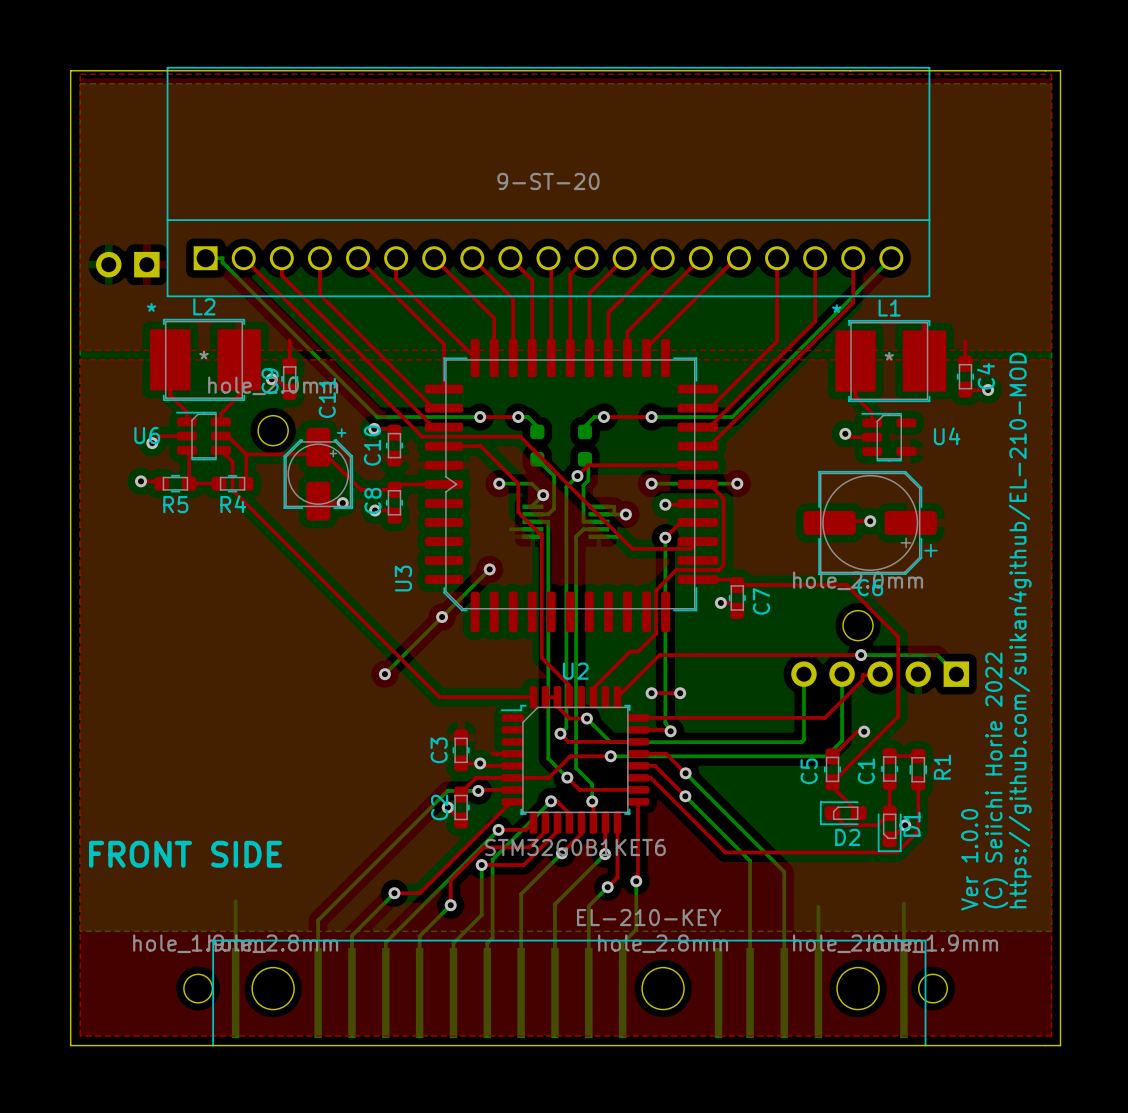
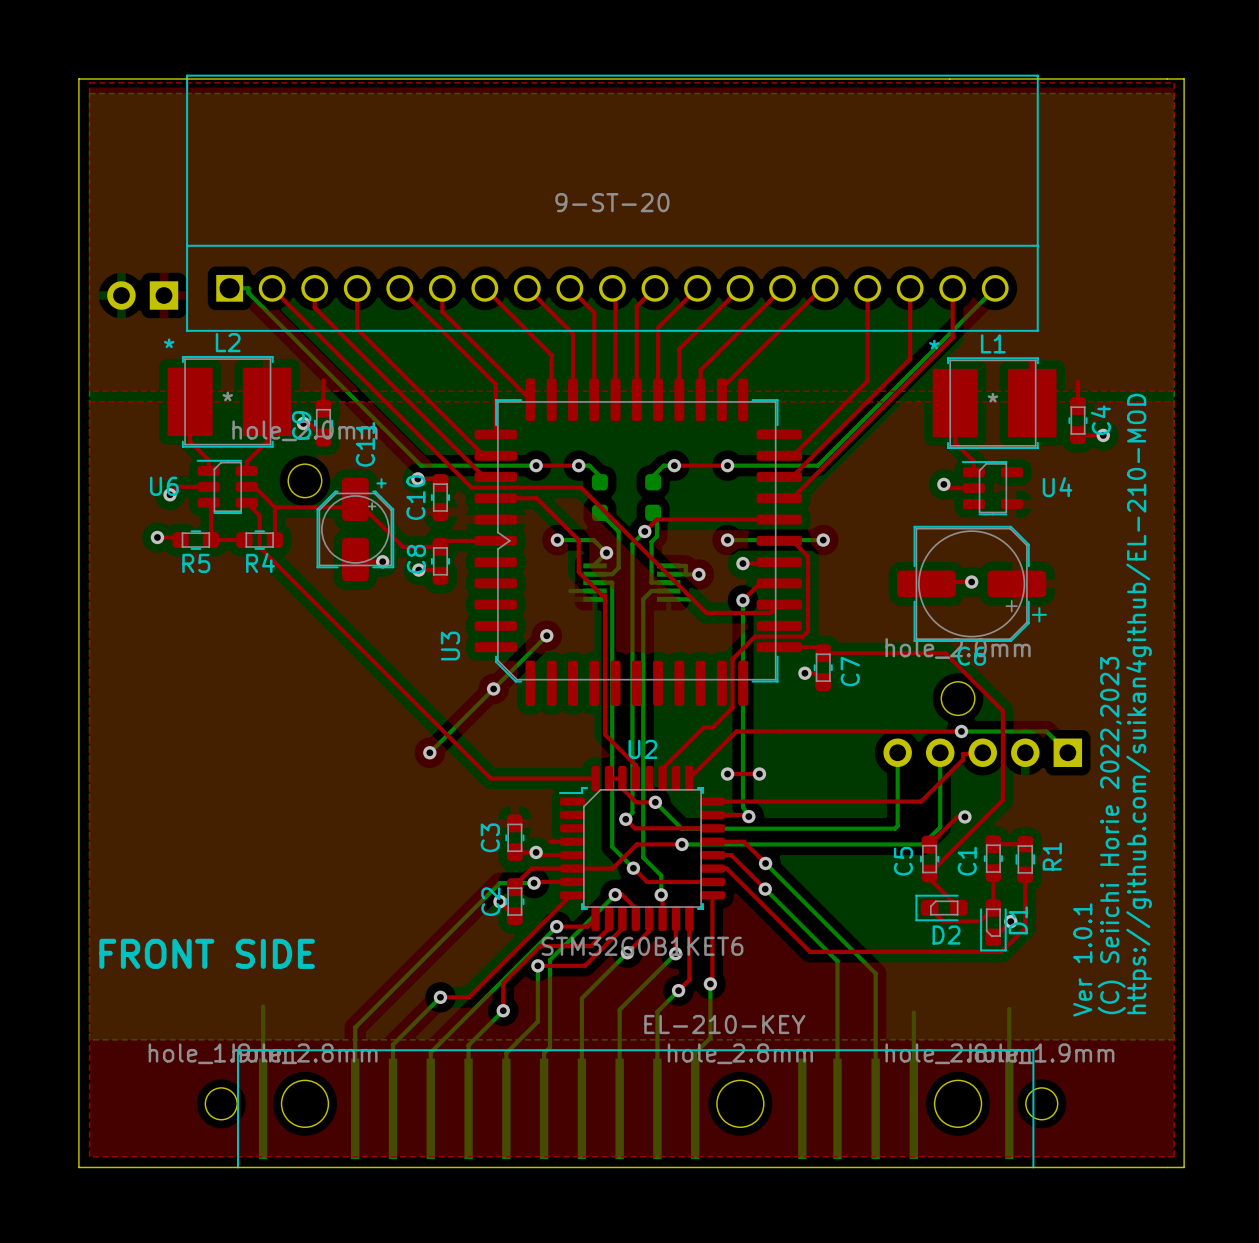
text: (C) Seiichi Horie 2022 (995, 780) -> (C) Seiichi Horie 2022,2023 (1111, 835)
text: Ver 1.0.0 (969, 859) -> Ver 1.0.1 (1082, 959)

